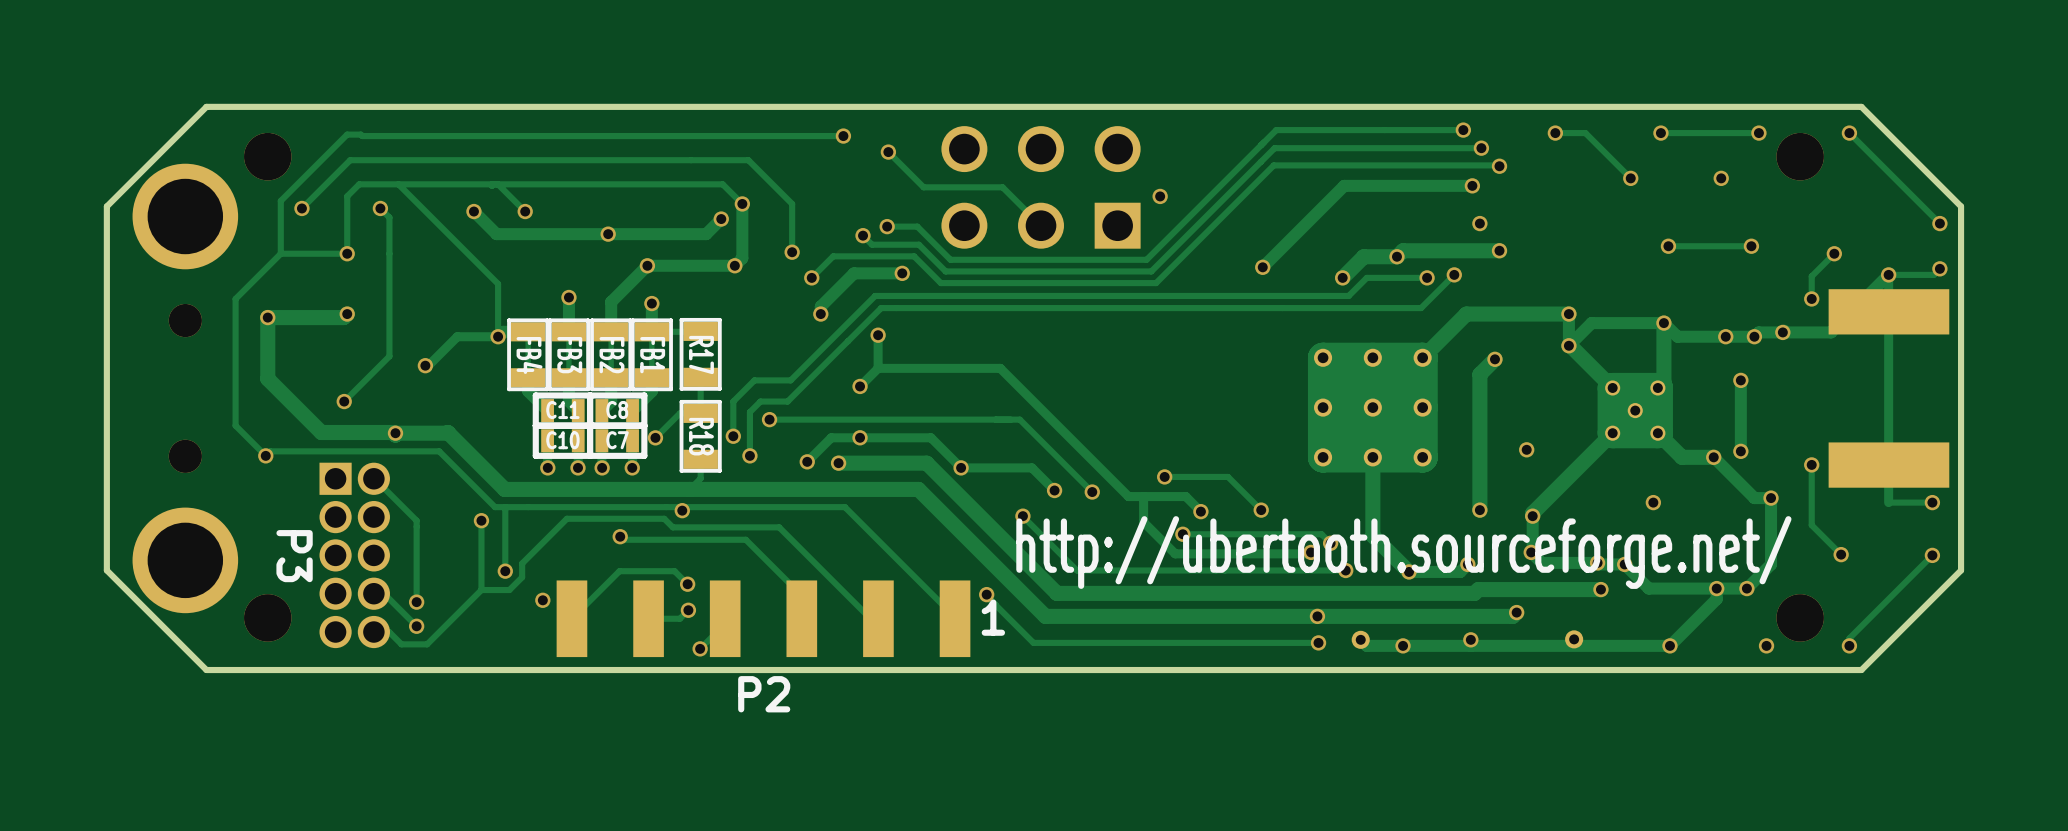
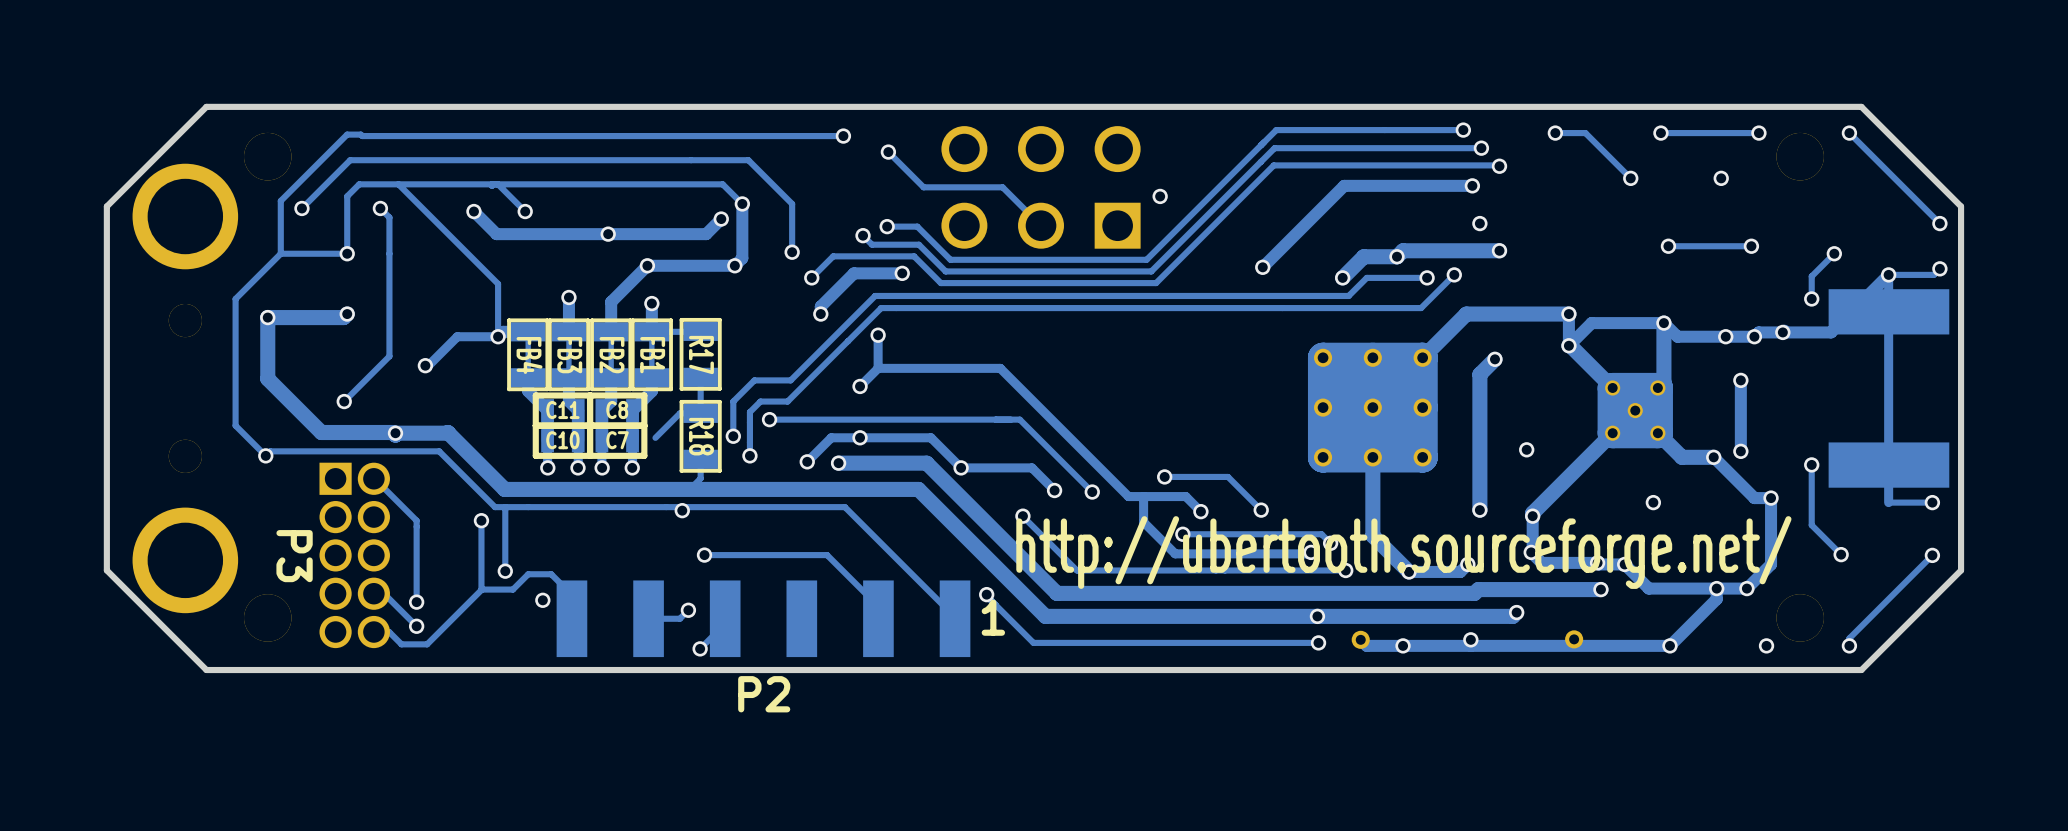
via: (655, 437) -> none
track: (620, 536) (623, 539) (745, 539) (801, 595) (801, 618) -> none
via: (620, 536) -> none
track: (687, 584) (674, 571) (619, 571) (571, 618) -> (481, 589) (512, 589) (528, 574) (551, 574) (571, 594) (571, 618)
via position: (687, 584) -> (704, 555)
track: (481, 590) (509, 590) (522, 577) (522, 563) (566, 518) (664, 518) (672, 527) (779, 527) (870, 618) (878, 618) -> (704, 555) (827, 555) (878, 606) (878, 618)

